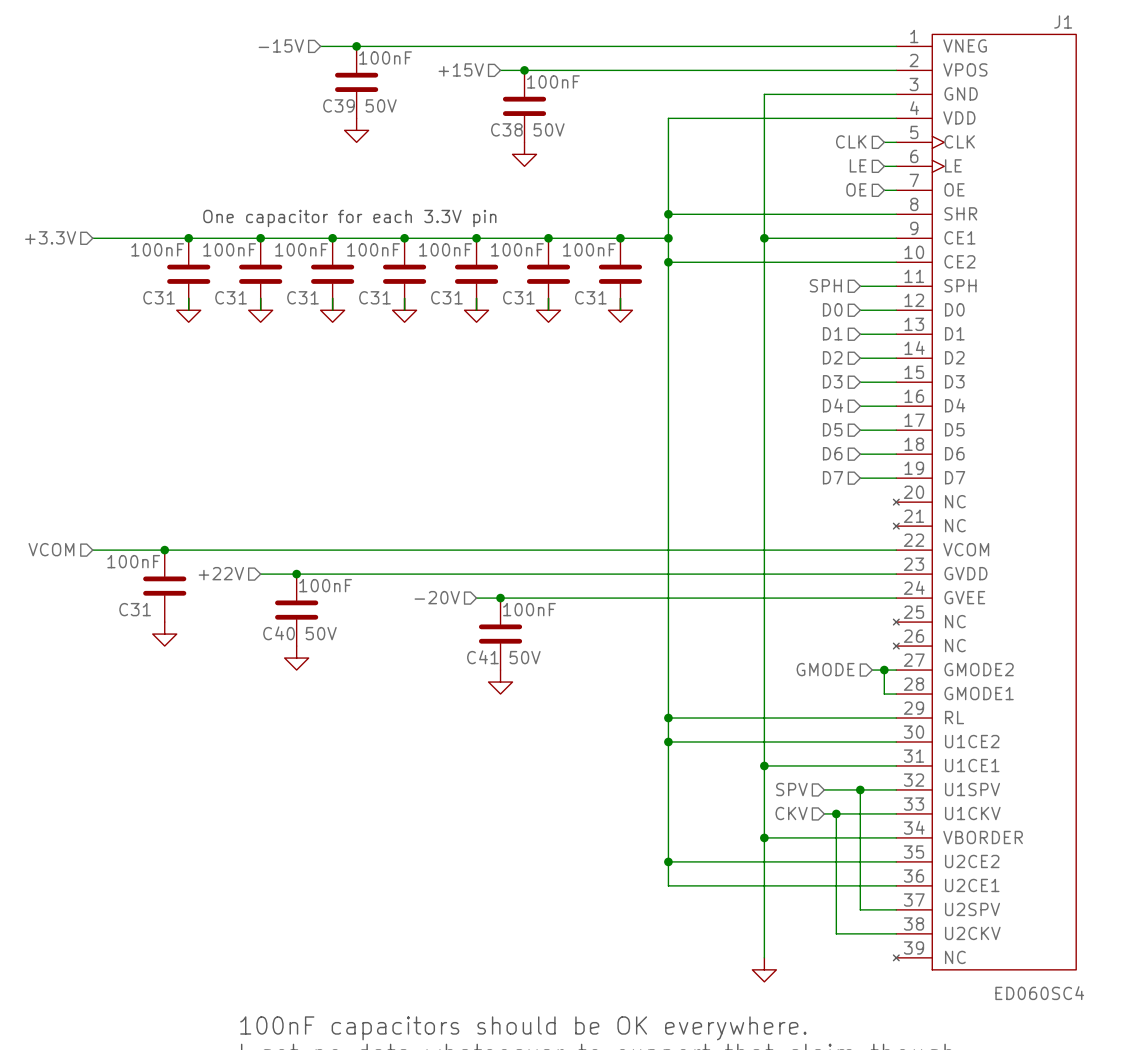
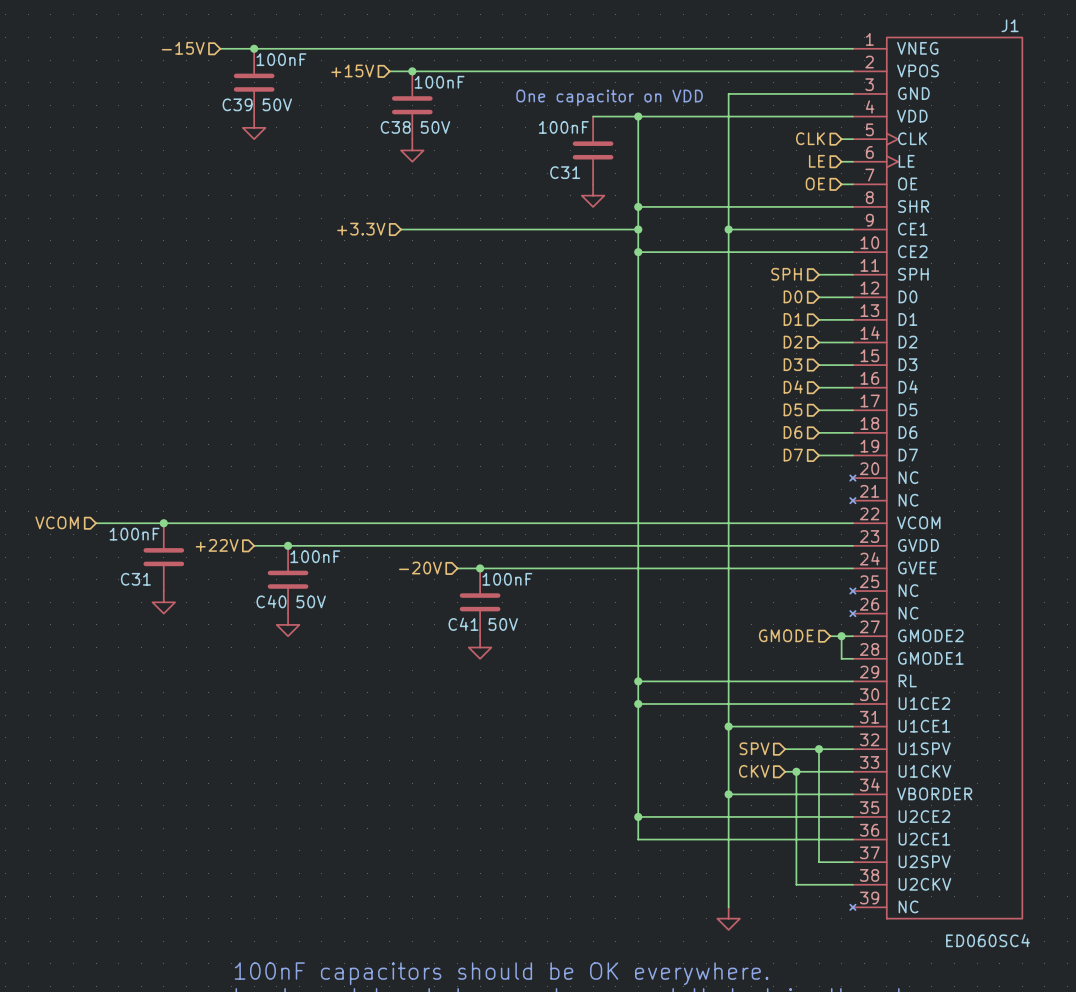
hierarchical label position: -15V (281, 45) -> -15V (183, 48)
wire: none -> (220, 48) (310, 48)
junction: none -> (254, 48)
junction: (356, 46) -> none
hierarchical label position: +15V (461, 69) -> +15V (352, 70)
wire: none -> (389, 71) (480, 71)
junction: none -> (412, 71)
junction: (524, 70) -> none
C39 position: (356, 82) -> (254, 82)
text: none -> One capacitor on VDD (609, 97)
C38 position: (524, 106) -> (412, 105)
wire: none -> (593, 116) (638, 116)
junction: none -> (638, 116)
power symbol: none -> (254, 127)
power symbol: (356, 130) -> none
power symbol: none -> (412, 150)
power symbol: (524, 154) -> none
C31: none -> 100nF (593, 150)
power symbol: none -> (593, 195)
text: One capacitor for each 3.3V pin (349, 218) -> none
hierarchical label: +3.3V (50, 237) -> none
hierarchical label: none -> +3.3V (361, 229)
wire: (92, 238) (416, 238) -> none
junction: (188, 238) -> none
junction: (260, 238) -> none
junction: (332, 238) -> none
junction: (404, 238) -> none
junction: (476, 238) -> none
junction: (548, 238) -> none
junction: (620, 238) -> none
C31: 100nF (188, 274) -> none
C31: 100nF (260, 274) -> none
C31: 100nF (332, 274) -> none
C31: 100nF (404, 274) -> none
C31: 100nF (476, 274) -> none
C31: 100nF (548, 274) -> none
C31: 100nF (620, 274) -> none
wire: (188, 298) (188, 310) -> none
wire: (260, 298) (260, 310) -> none
wire: (332, 298) (332, 310) -> none
wire: (404, 298) (404, 310) -> none
wire: (476, 298) (476, 310) -> none
wire: (548, 298) (548, 310) -> none
wire: (620, 298) (620, 310) -> none
power symbol: (188, 310) -> none
power symbol: (260, 310) -> none
power symbol: (332, 310) -> none
power symbol: (404, 310) -> none
power symbol: (476, 310) -> none
power symbol: (548, 310) -> none
power symbol: (620, 310) -> none

